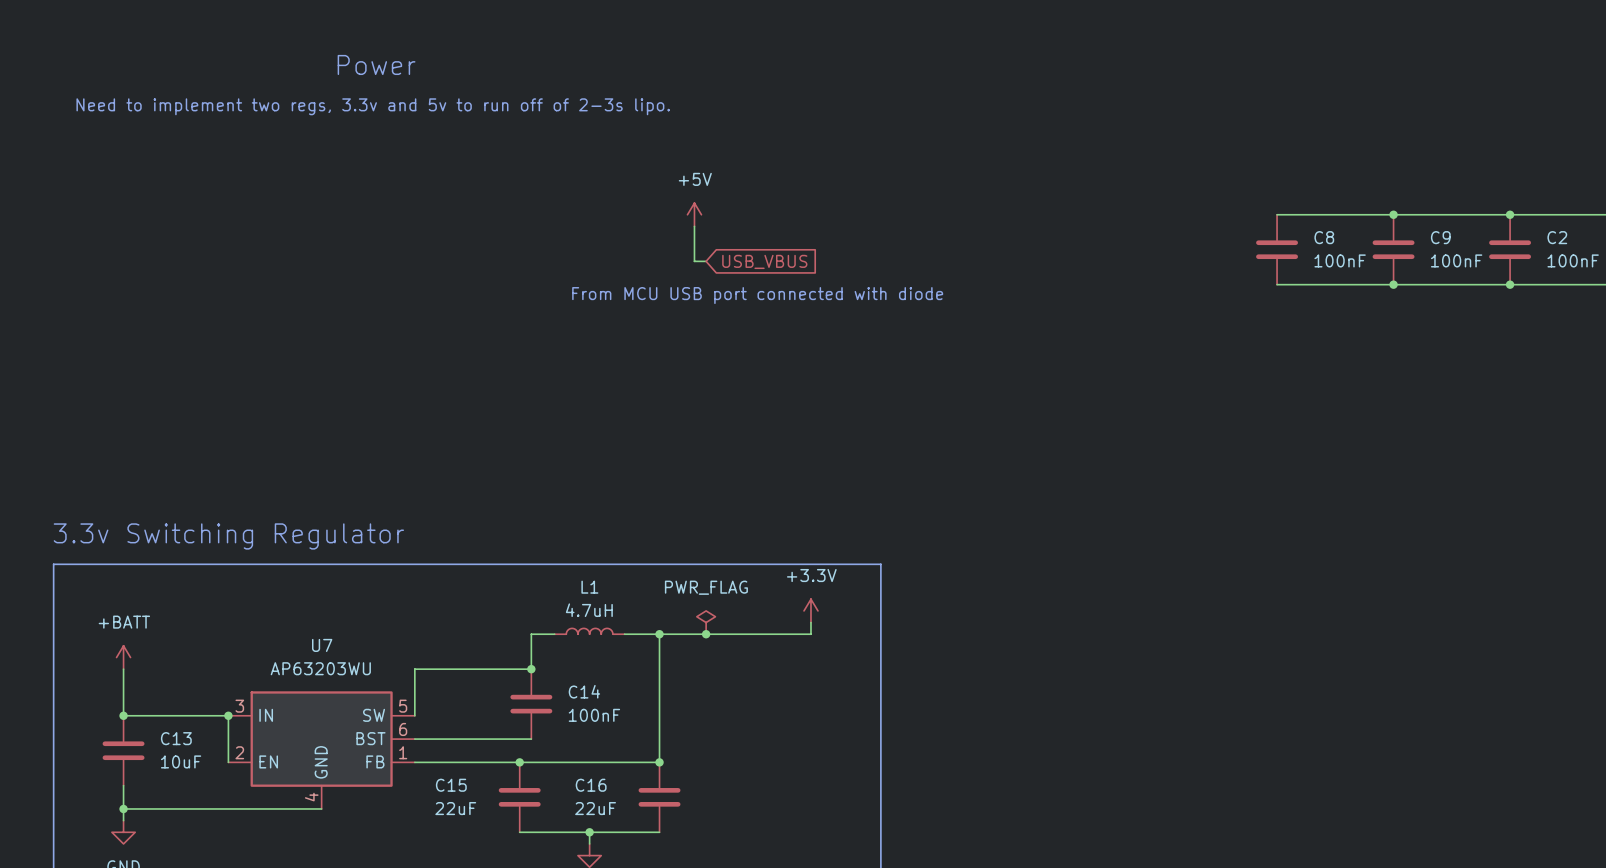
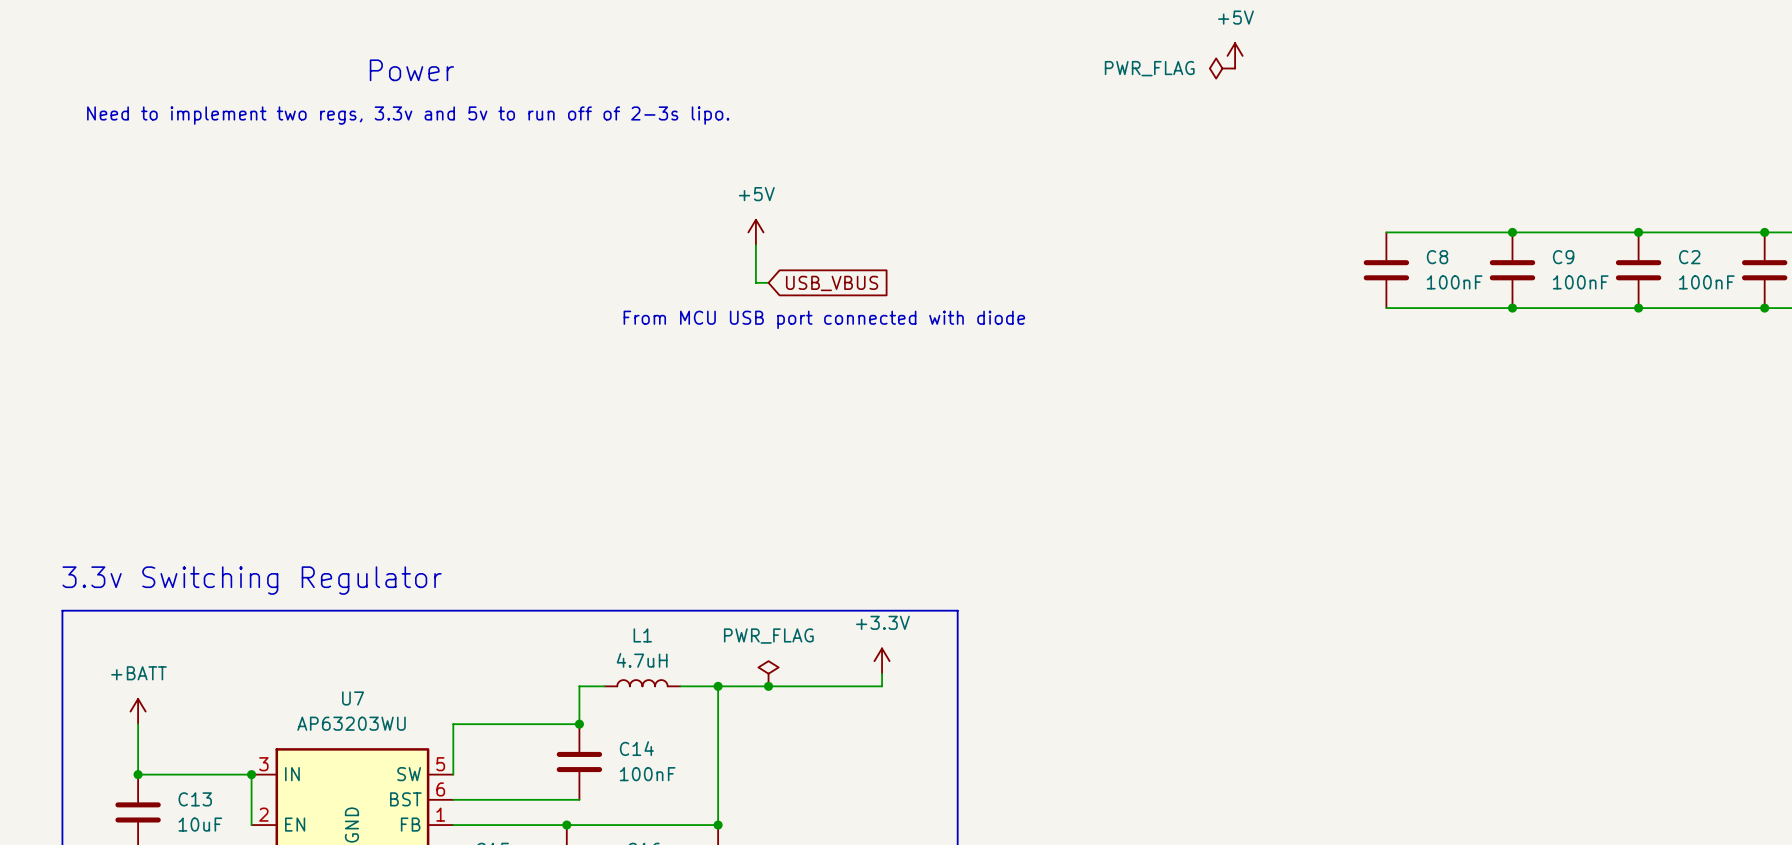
power symbol: none -> +5V (1235, 55)
power symbol: none -> PWR_FLAG (1222, 68)

